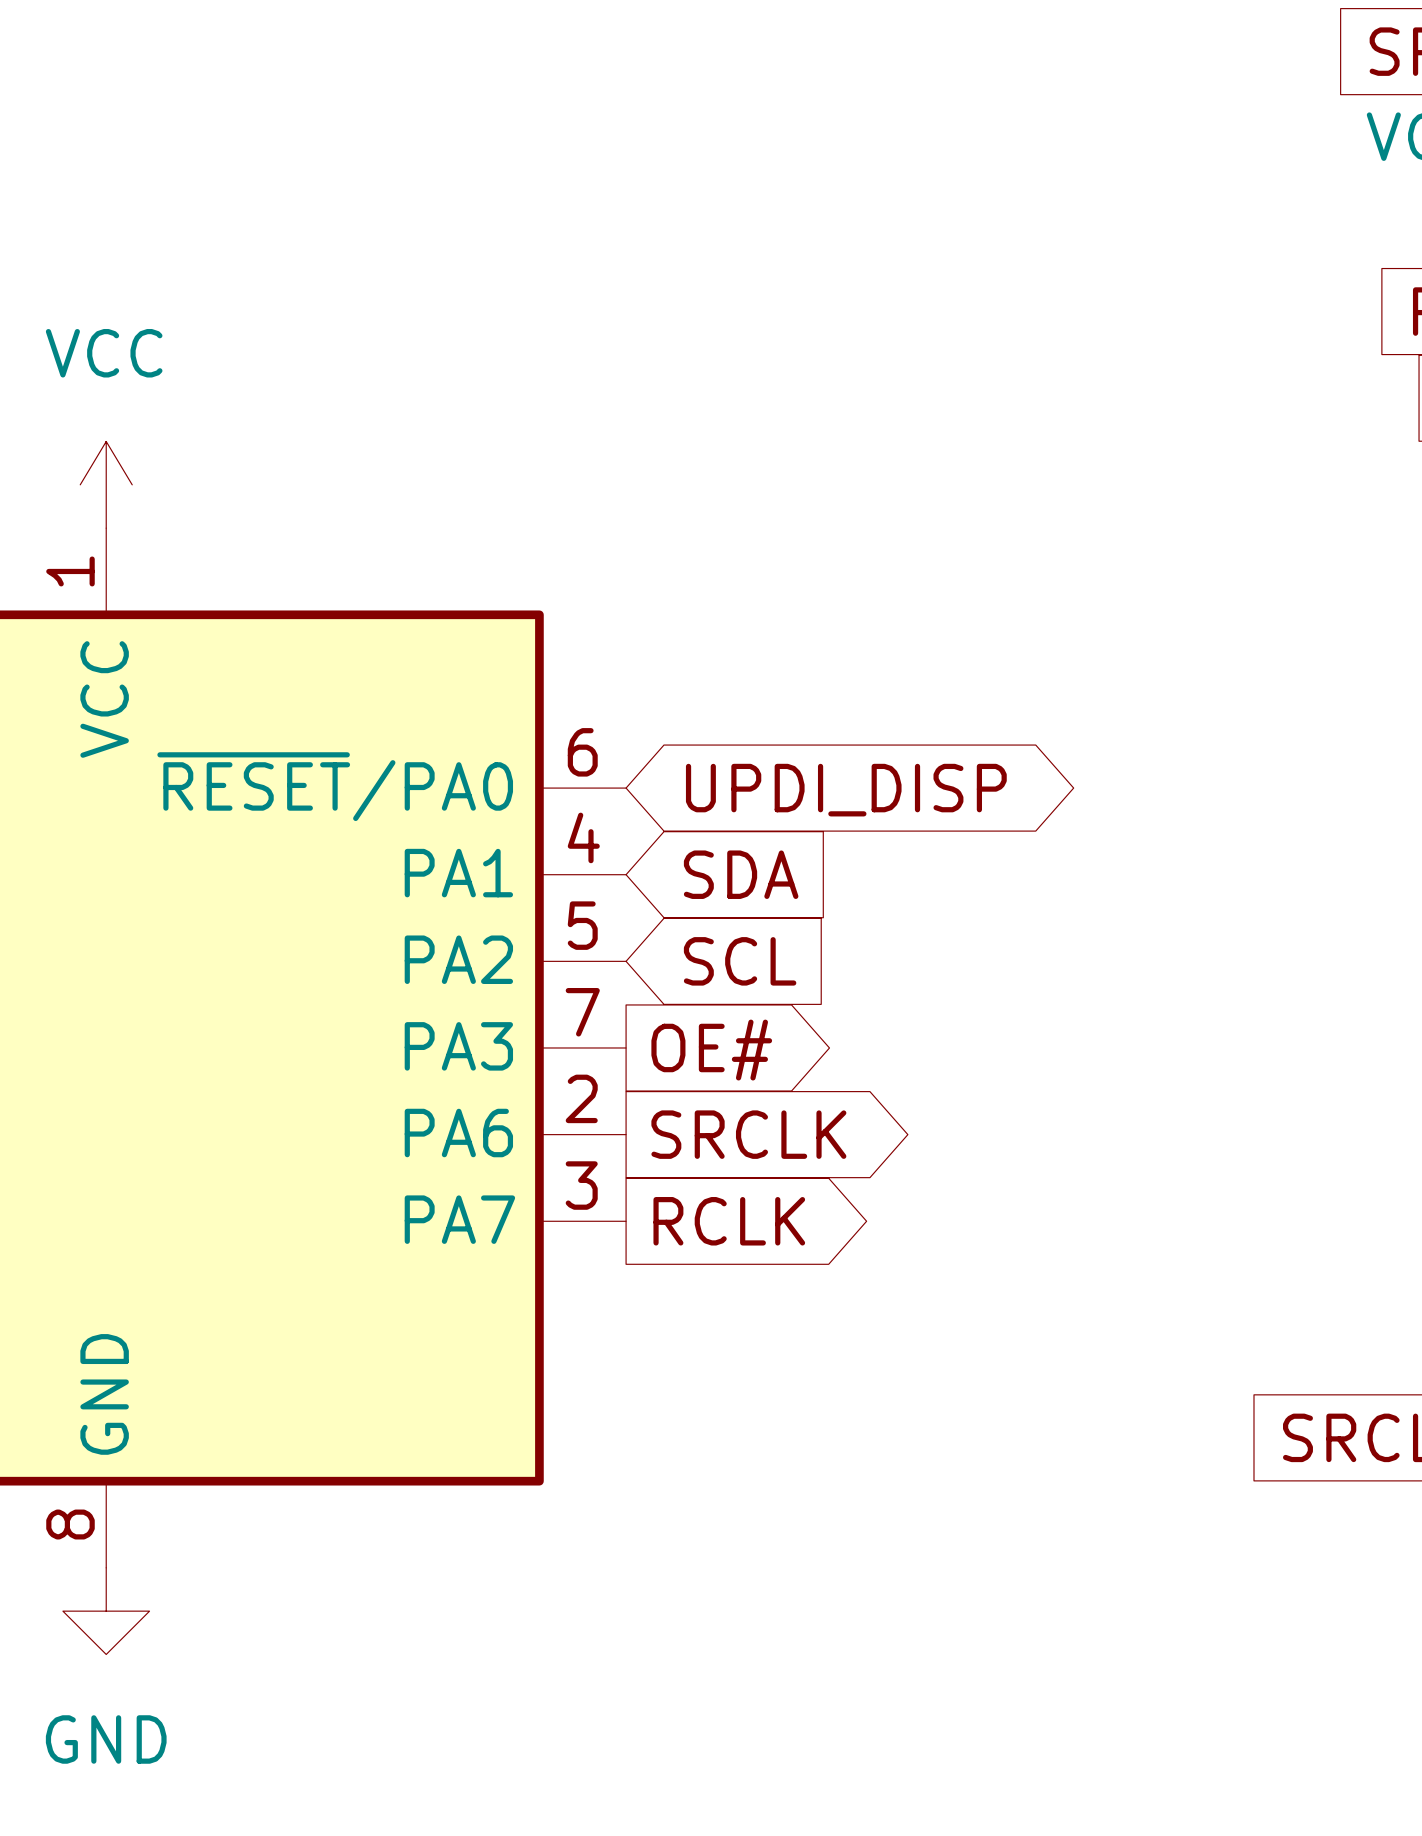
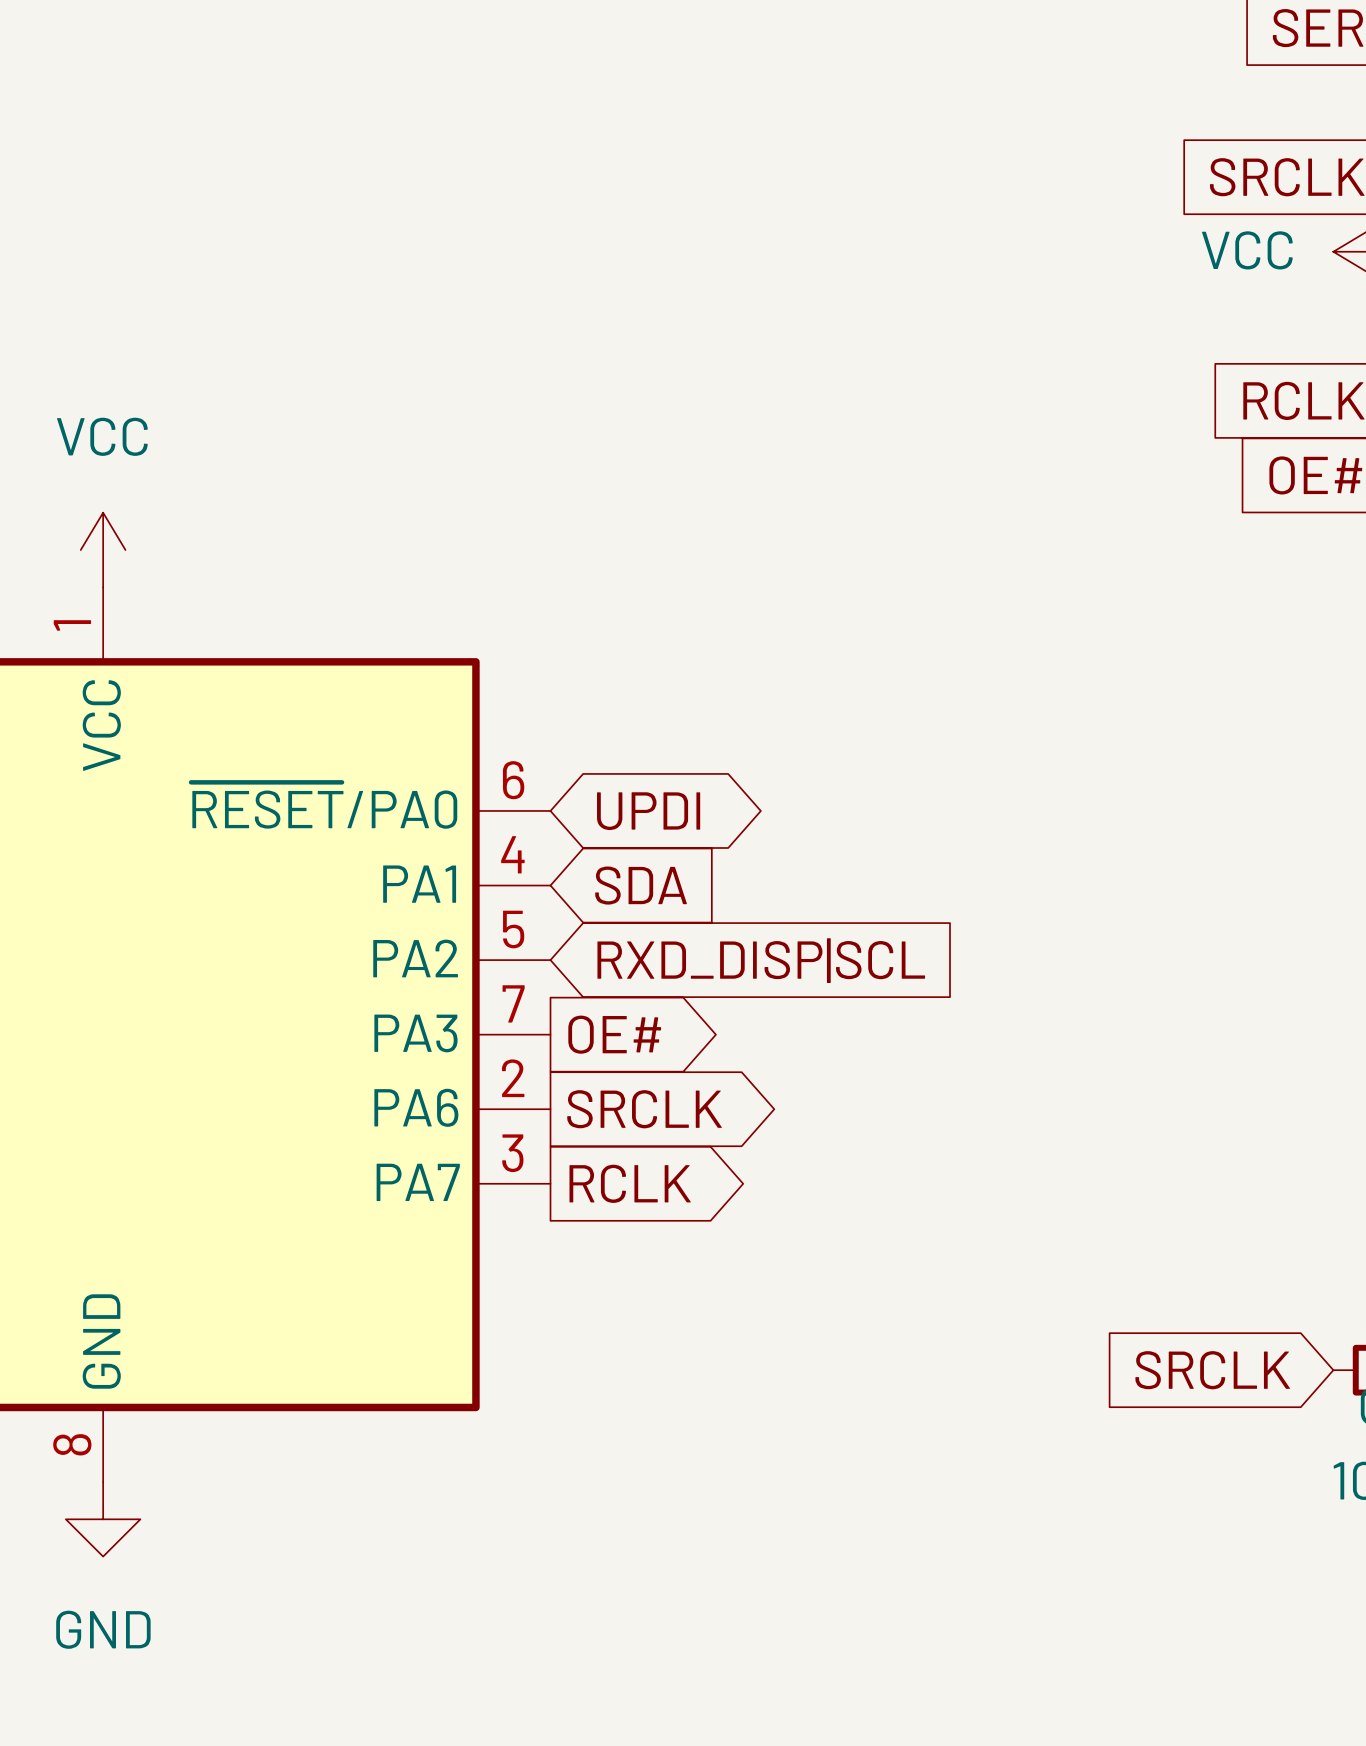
global label: UPDI_DISP (846, 790) -> UPDI (648, 811)
global label: SCL (740, 961) -> RXD_DISP|SCL (761, 960)

